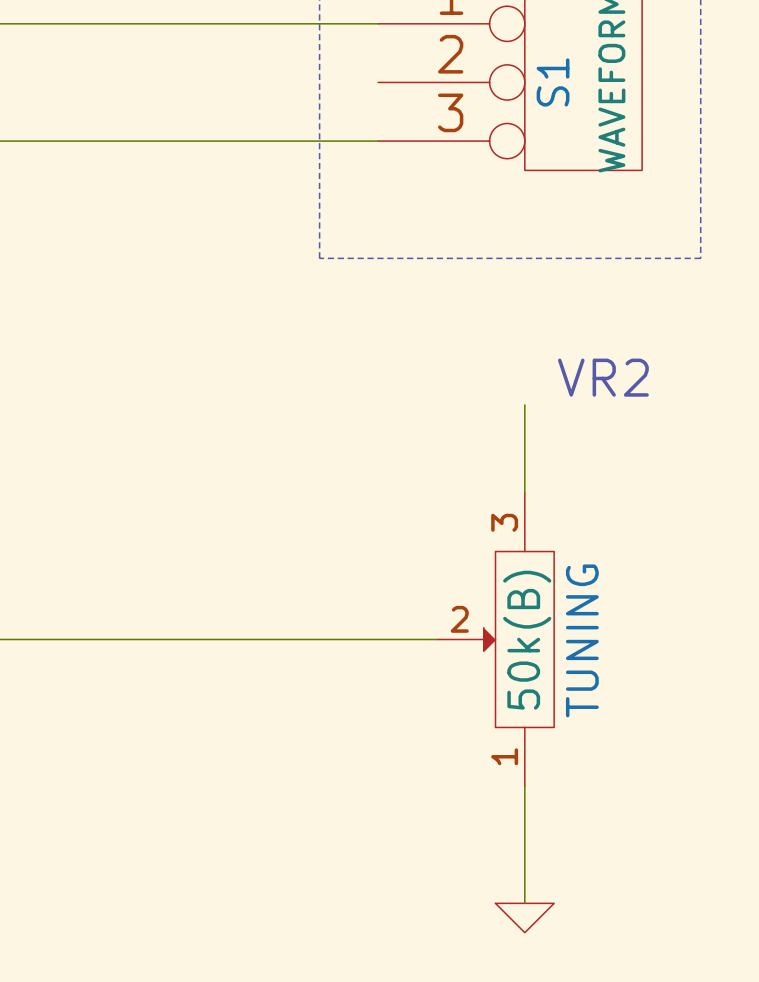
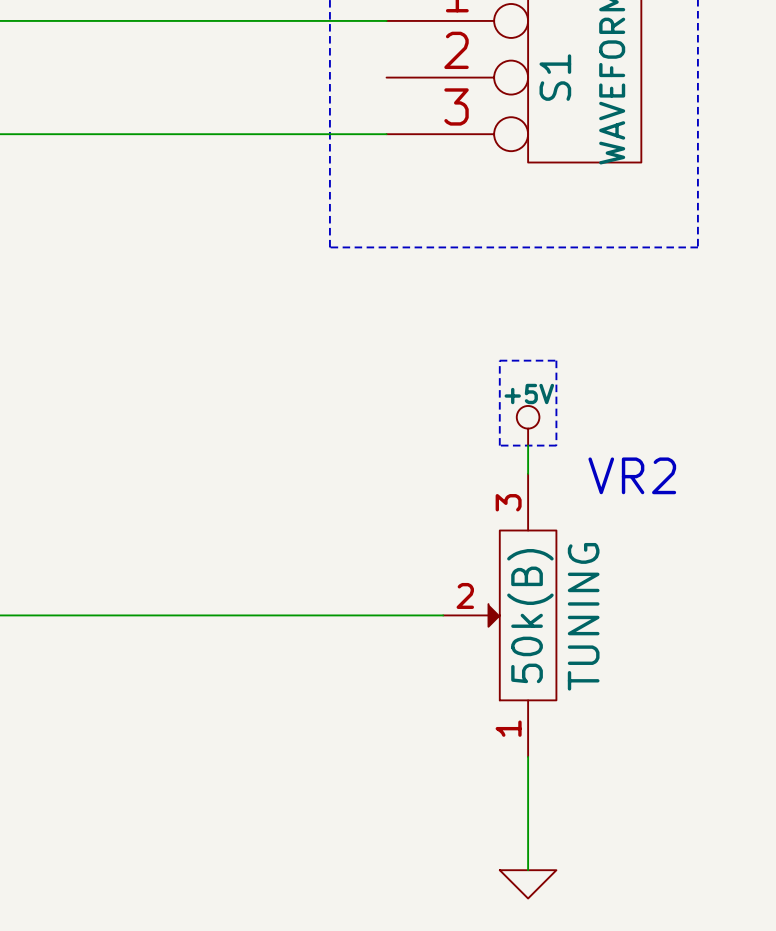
line: none -> (499, 360) (556, 360) (556, 445) (499, 445) (499, 360)
text position: VR2 (603, 377) -> VR2 (632, 475)
wire: (524, 404) (524, 463) -> none
power symbol: none -> +5V (528, 425)

